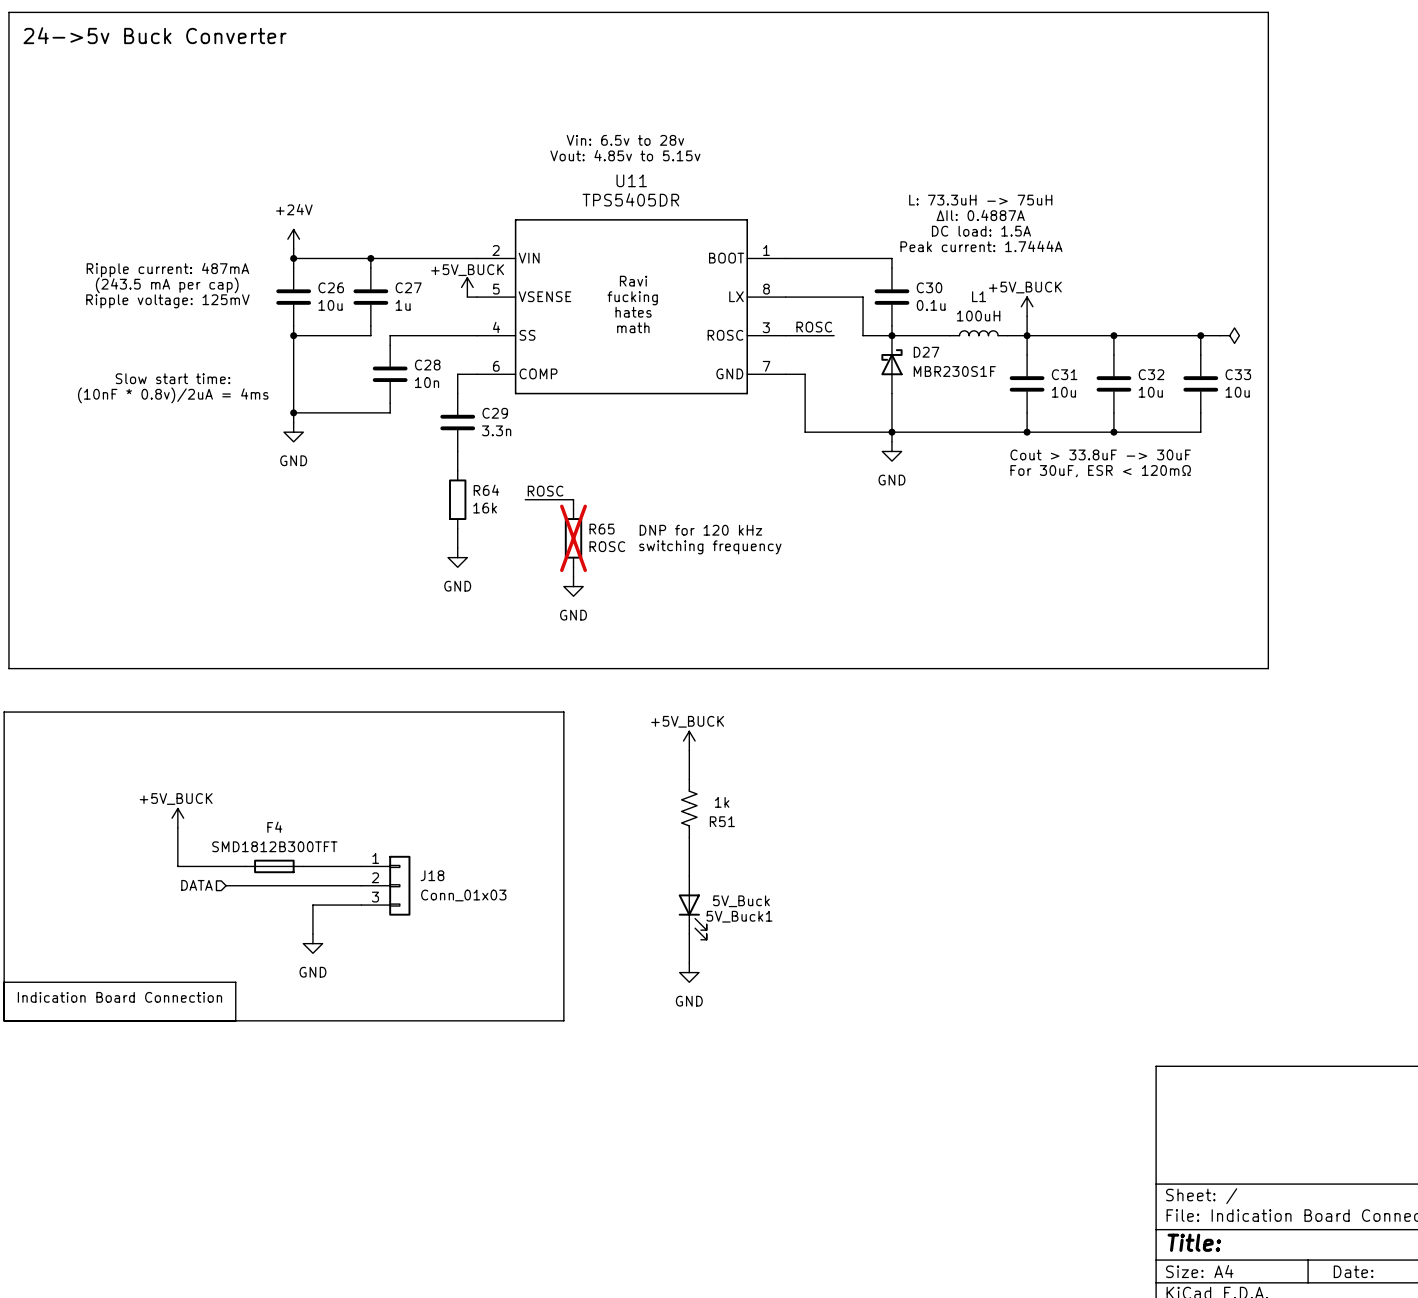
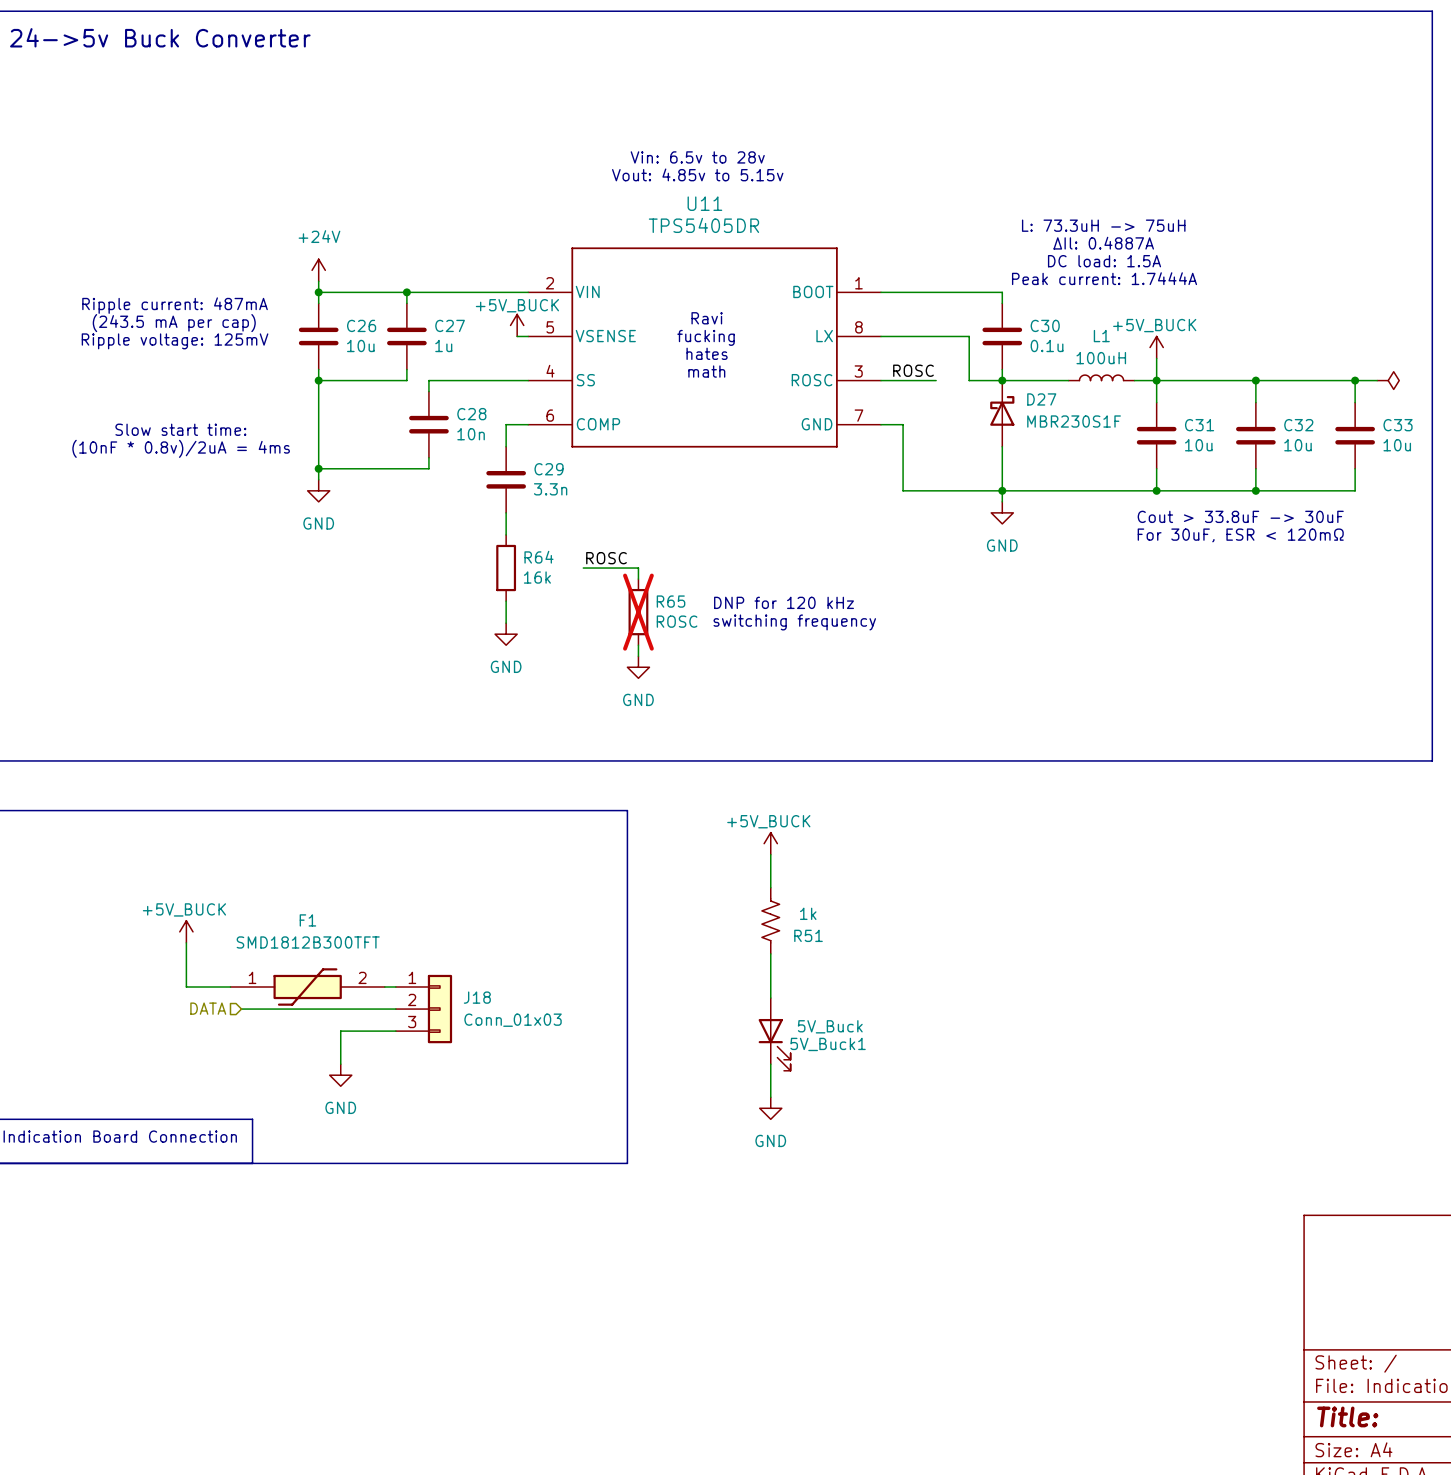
F4: SMD1812B300TFT (274, 866) -> none
F1: none -> SMD1812B300TFT (307, 987)

